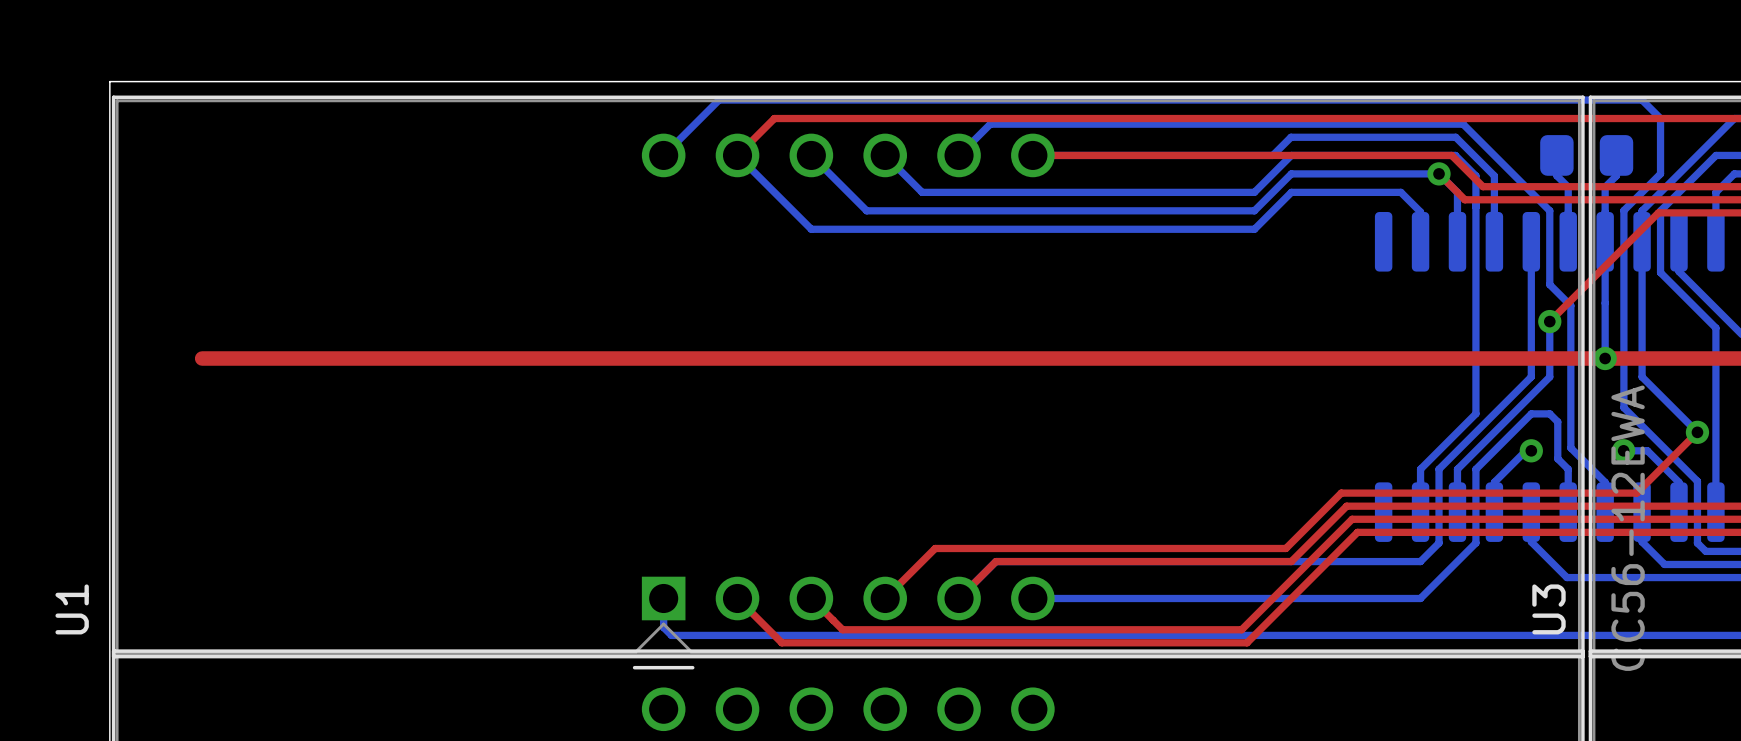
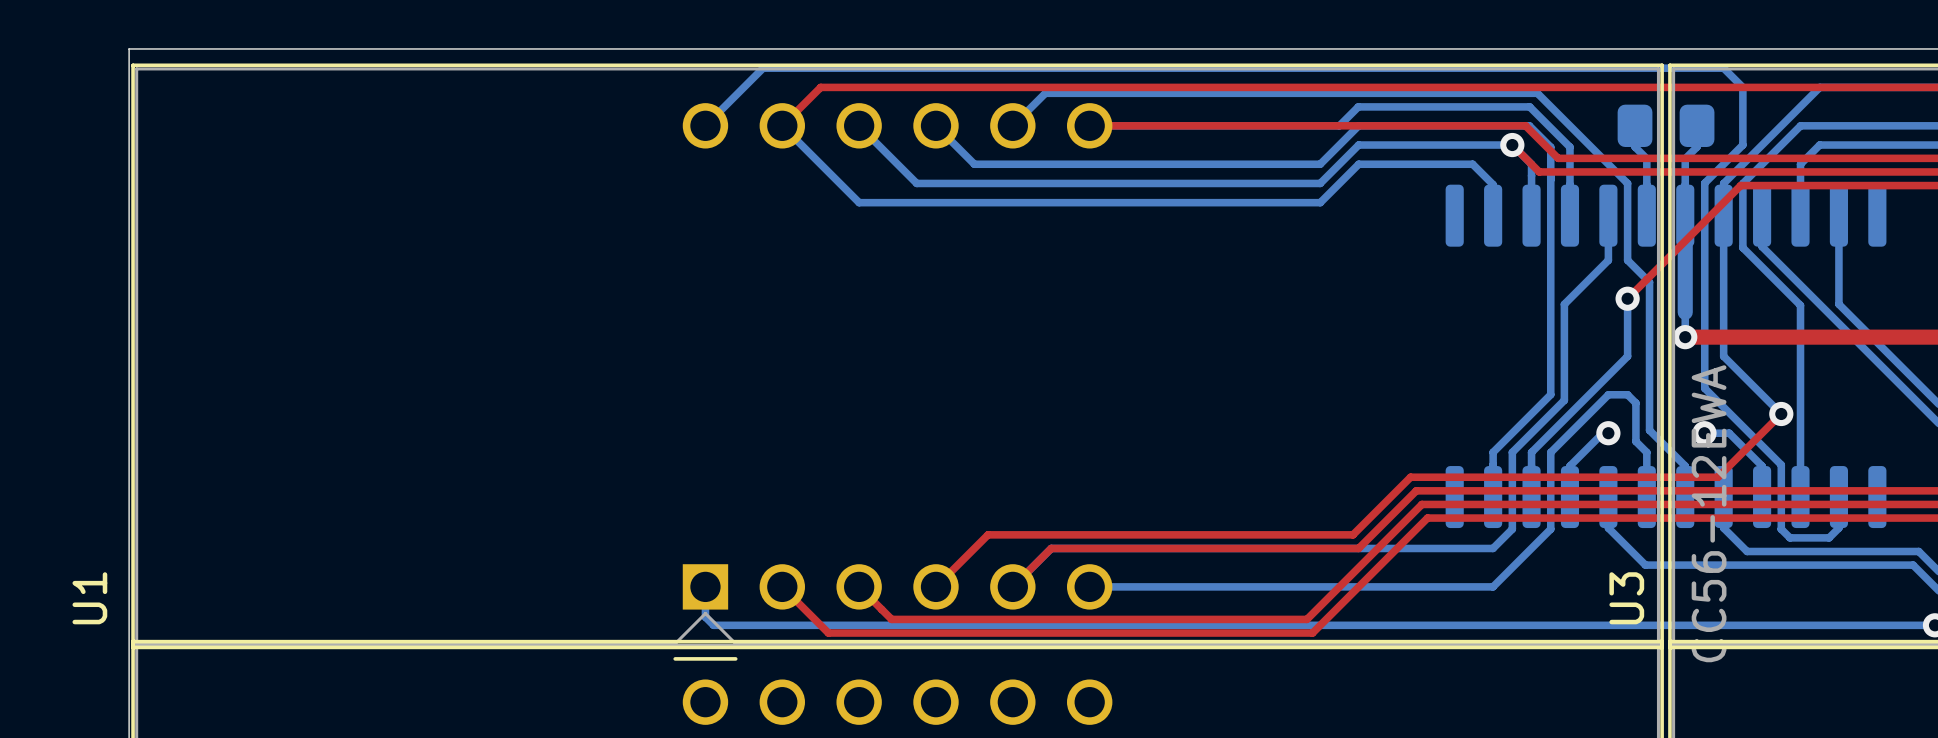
bottom track width: thin (1605, 241) (1605, 334) -> thick (1685, 215) (1685, 312)
bottom track: (1531, 284) (1531, 376) (1489, 419) -> (1608, 260) (1564, 304) (1564, 400)
top track: (202, 358) (1605, 358) -> none

